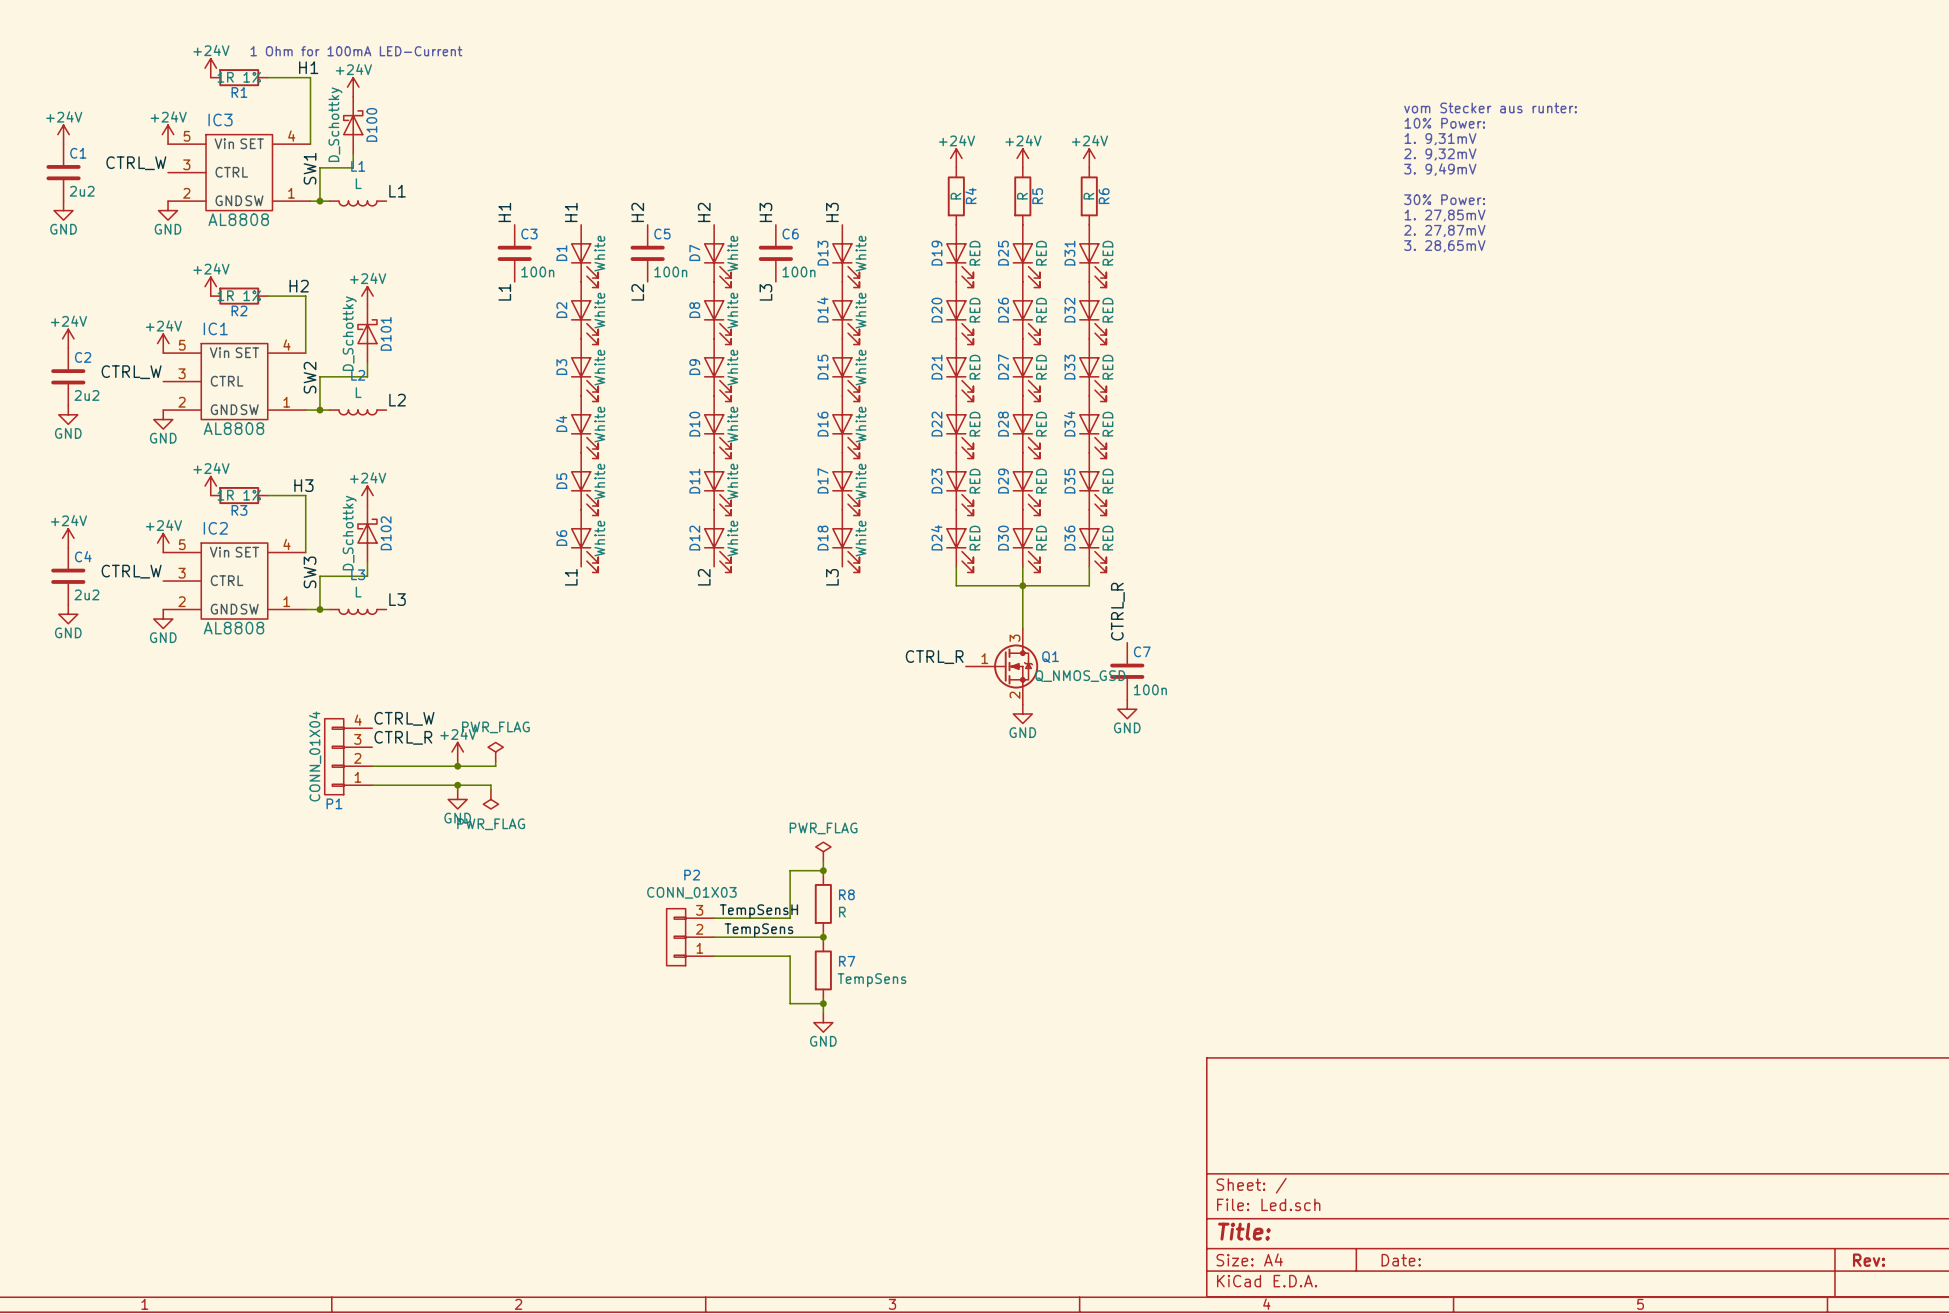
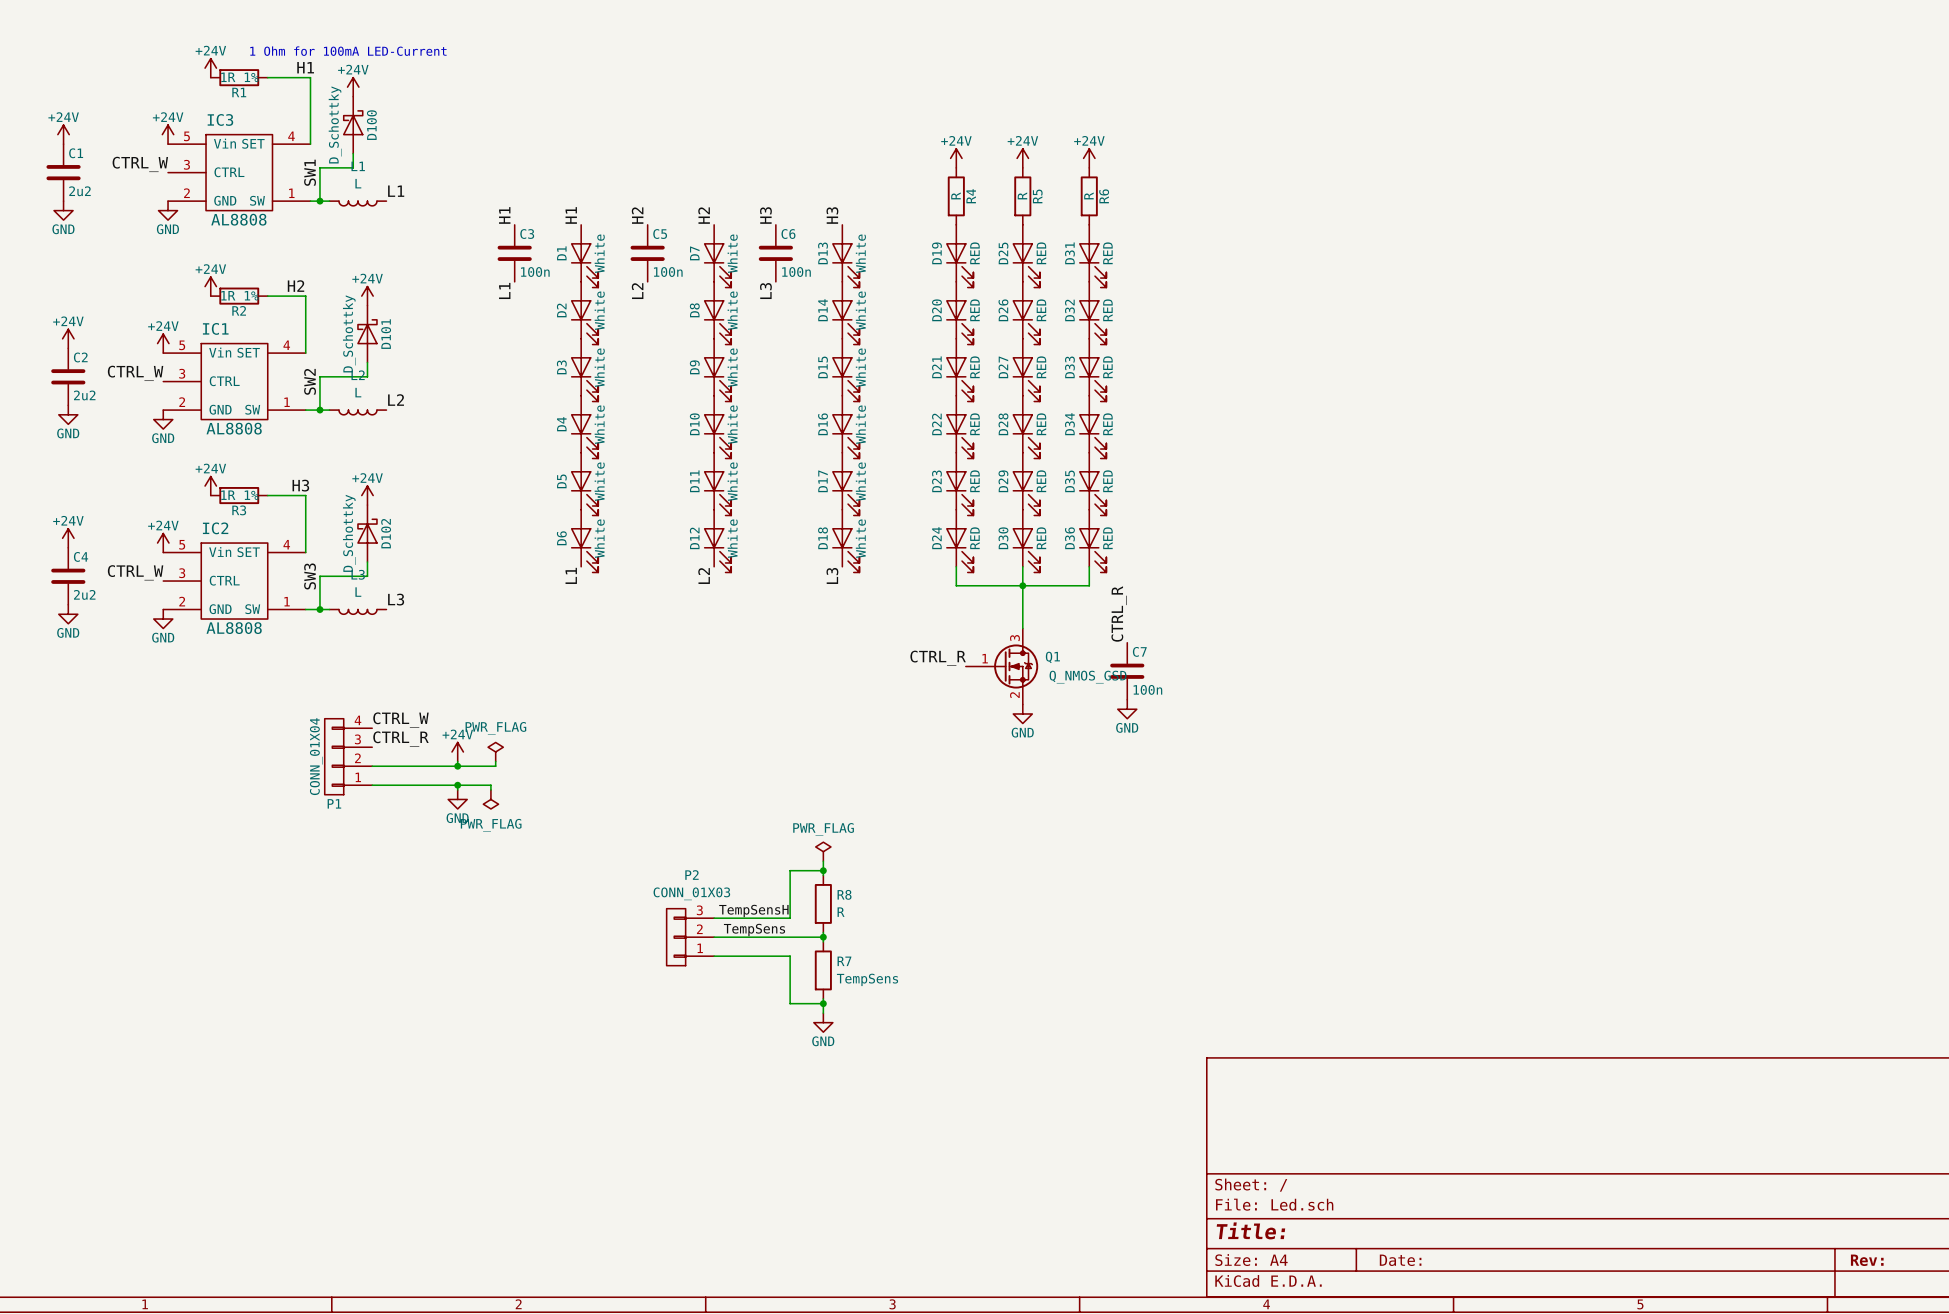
text: vom Stecker aus runter: (1490, 107) -> none
text: 10% Power: (1444, 123) -> none
text: 1. 9,31mV (1440, 139) -> none
text: 2. 9,32mV (1440, 154) -> none
text: 3. 9,49mV (1440, 169) -> none
text: 30% Power: (1444, 199) -> none
text: 1. 27,85mV (1445, 215) -> none
text: 2. 27,87mV (1444, 230) -> none
text: 3. 28,65mV (1444, 246) -> none

